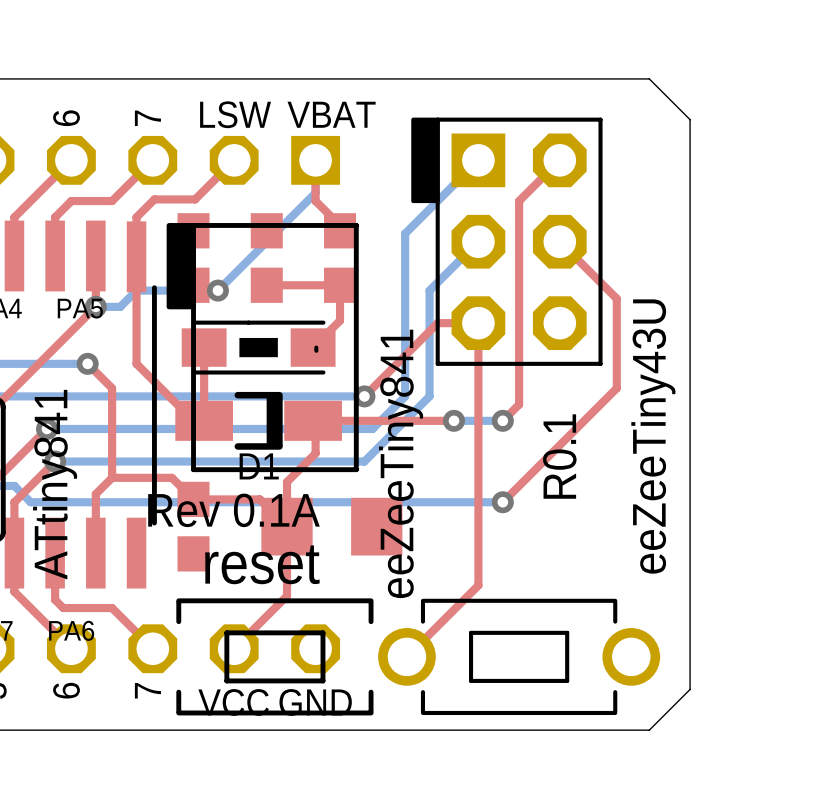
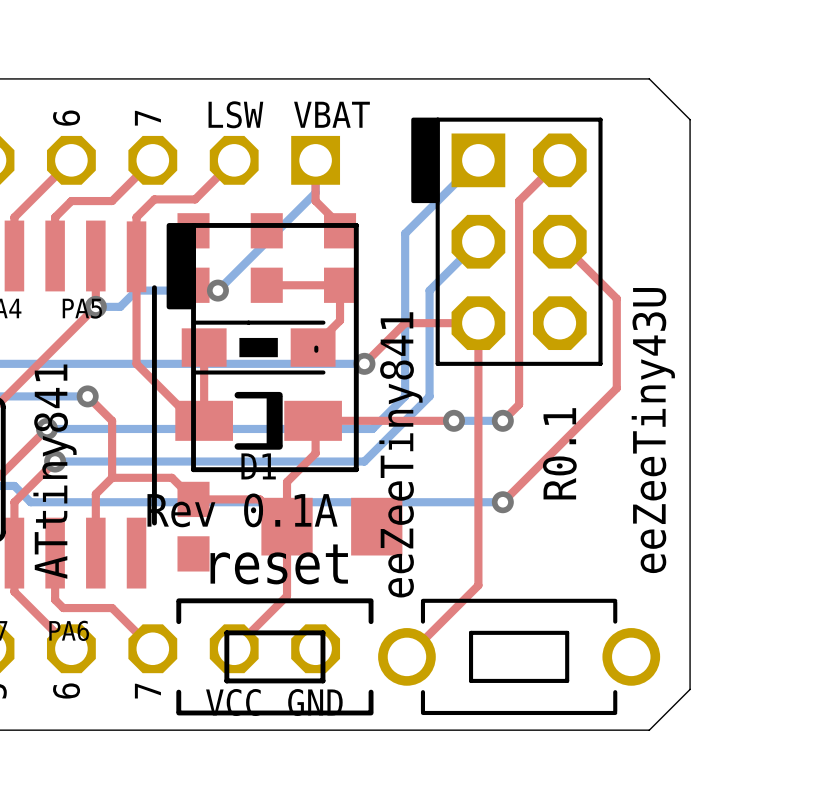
top track: (437, 323) (364, 396) -> (437, 323) (405, 323) (364, 363)
top track: (87, 363) (112, 388) (112, 420) -> (87, 396) (112, 420)
via position: (87, 363) -> (87, 396)
bottom track: (87, 396) (364, 396) -> (87, 363) (364, 363)
via position: (364, 396) -> (364, 363)

